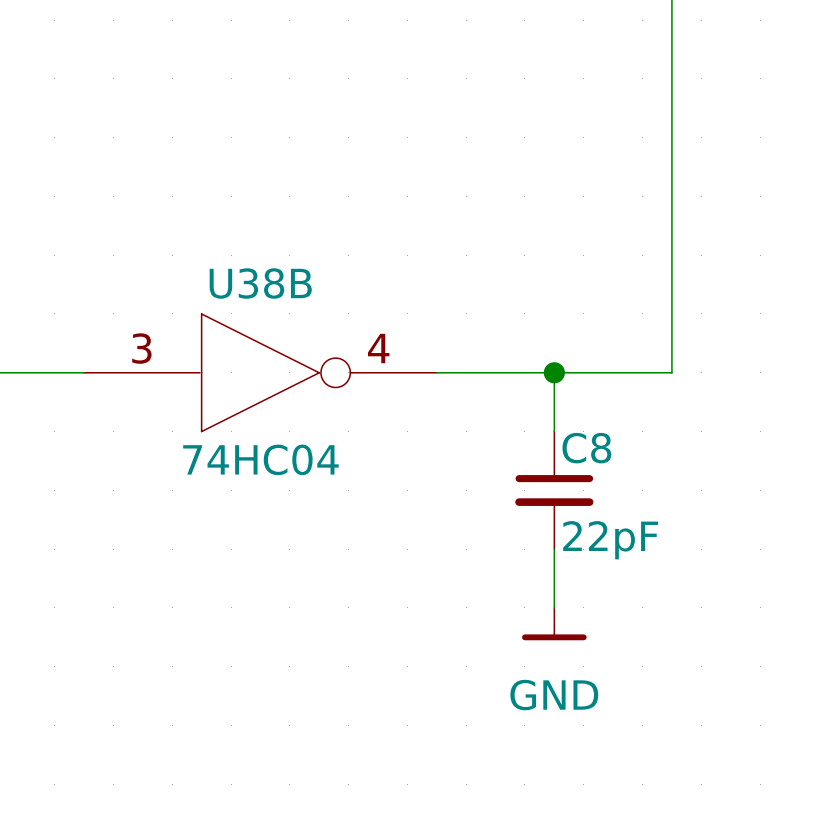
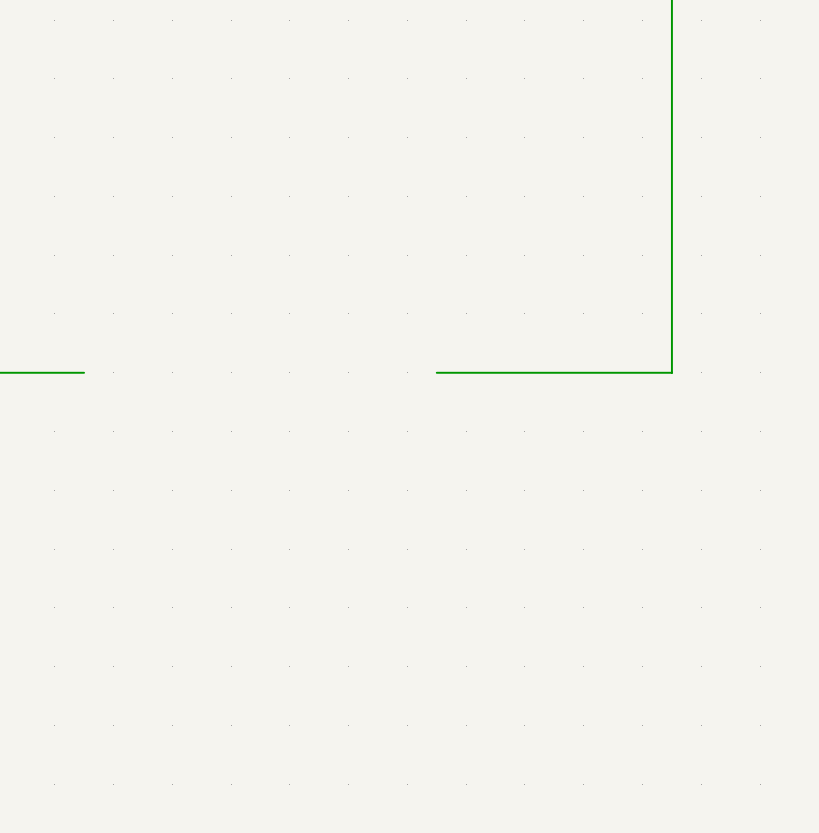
U38B: 74HC04 (260, 372) -> none
wire: (554, 372) (554, 431) -> none
junction: (554, 372) -> none
C8: 22pF (554, 490) -> none
wire: (554, 549) (554, 607) -> none
power symbol: GND (554, 624) -> none

